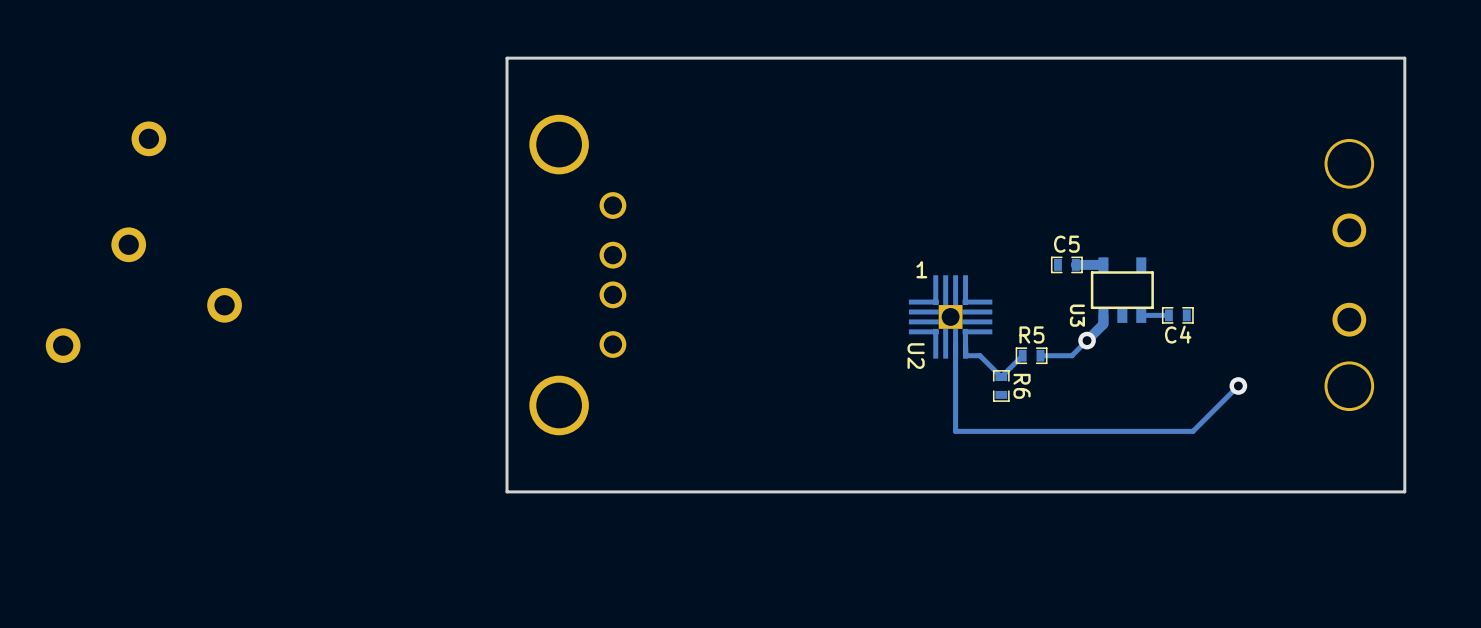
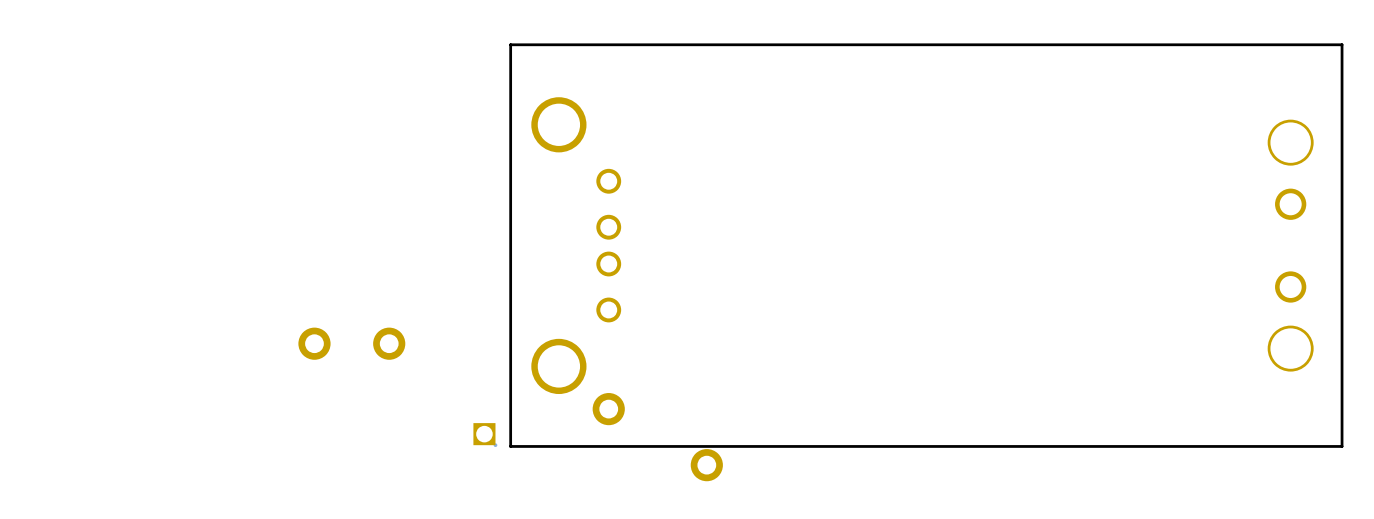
part: (148, 138) -> none
part: (128, 244) -> none
C5: (1066, 264) -> none
track: (1103, 264) (1075, 264) -> none
U3: (1122, 290) -> none
part: (224, 305) -> none
track: (1103, 315) (1103, 324) (1071, 355) (1040, 355) -> none
track: (1168, 315) (1141, 315) -> none
C4: (1177, 315) -> none
U2: (950, 316) -> none
via: (1087, 340) -> none
track: (955, 343) (955, 431) (1192, 431) (1238, 385) -> none
track: (965, 343) (966, 355) (979, 355) (1001, 377) (1022, 355) -> none
part: (63, 345) -> none
R5: (1031, 355) -> none
part: none -> (314, 343)
part: none -> (389, 343)
R6: (1001, 385) -> none
via: (1238, 385) -> none
part: none -> (608, 409)
part: none -> (485, 435)
part: none -> (706, 465)

